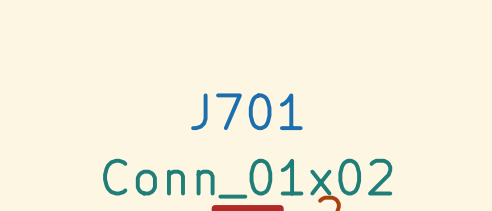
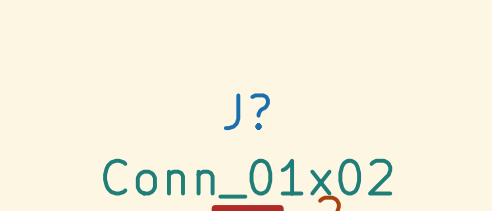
J701 name: J701 (246, 111) -> J? (246, 111)

